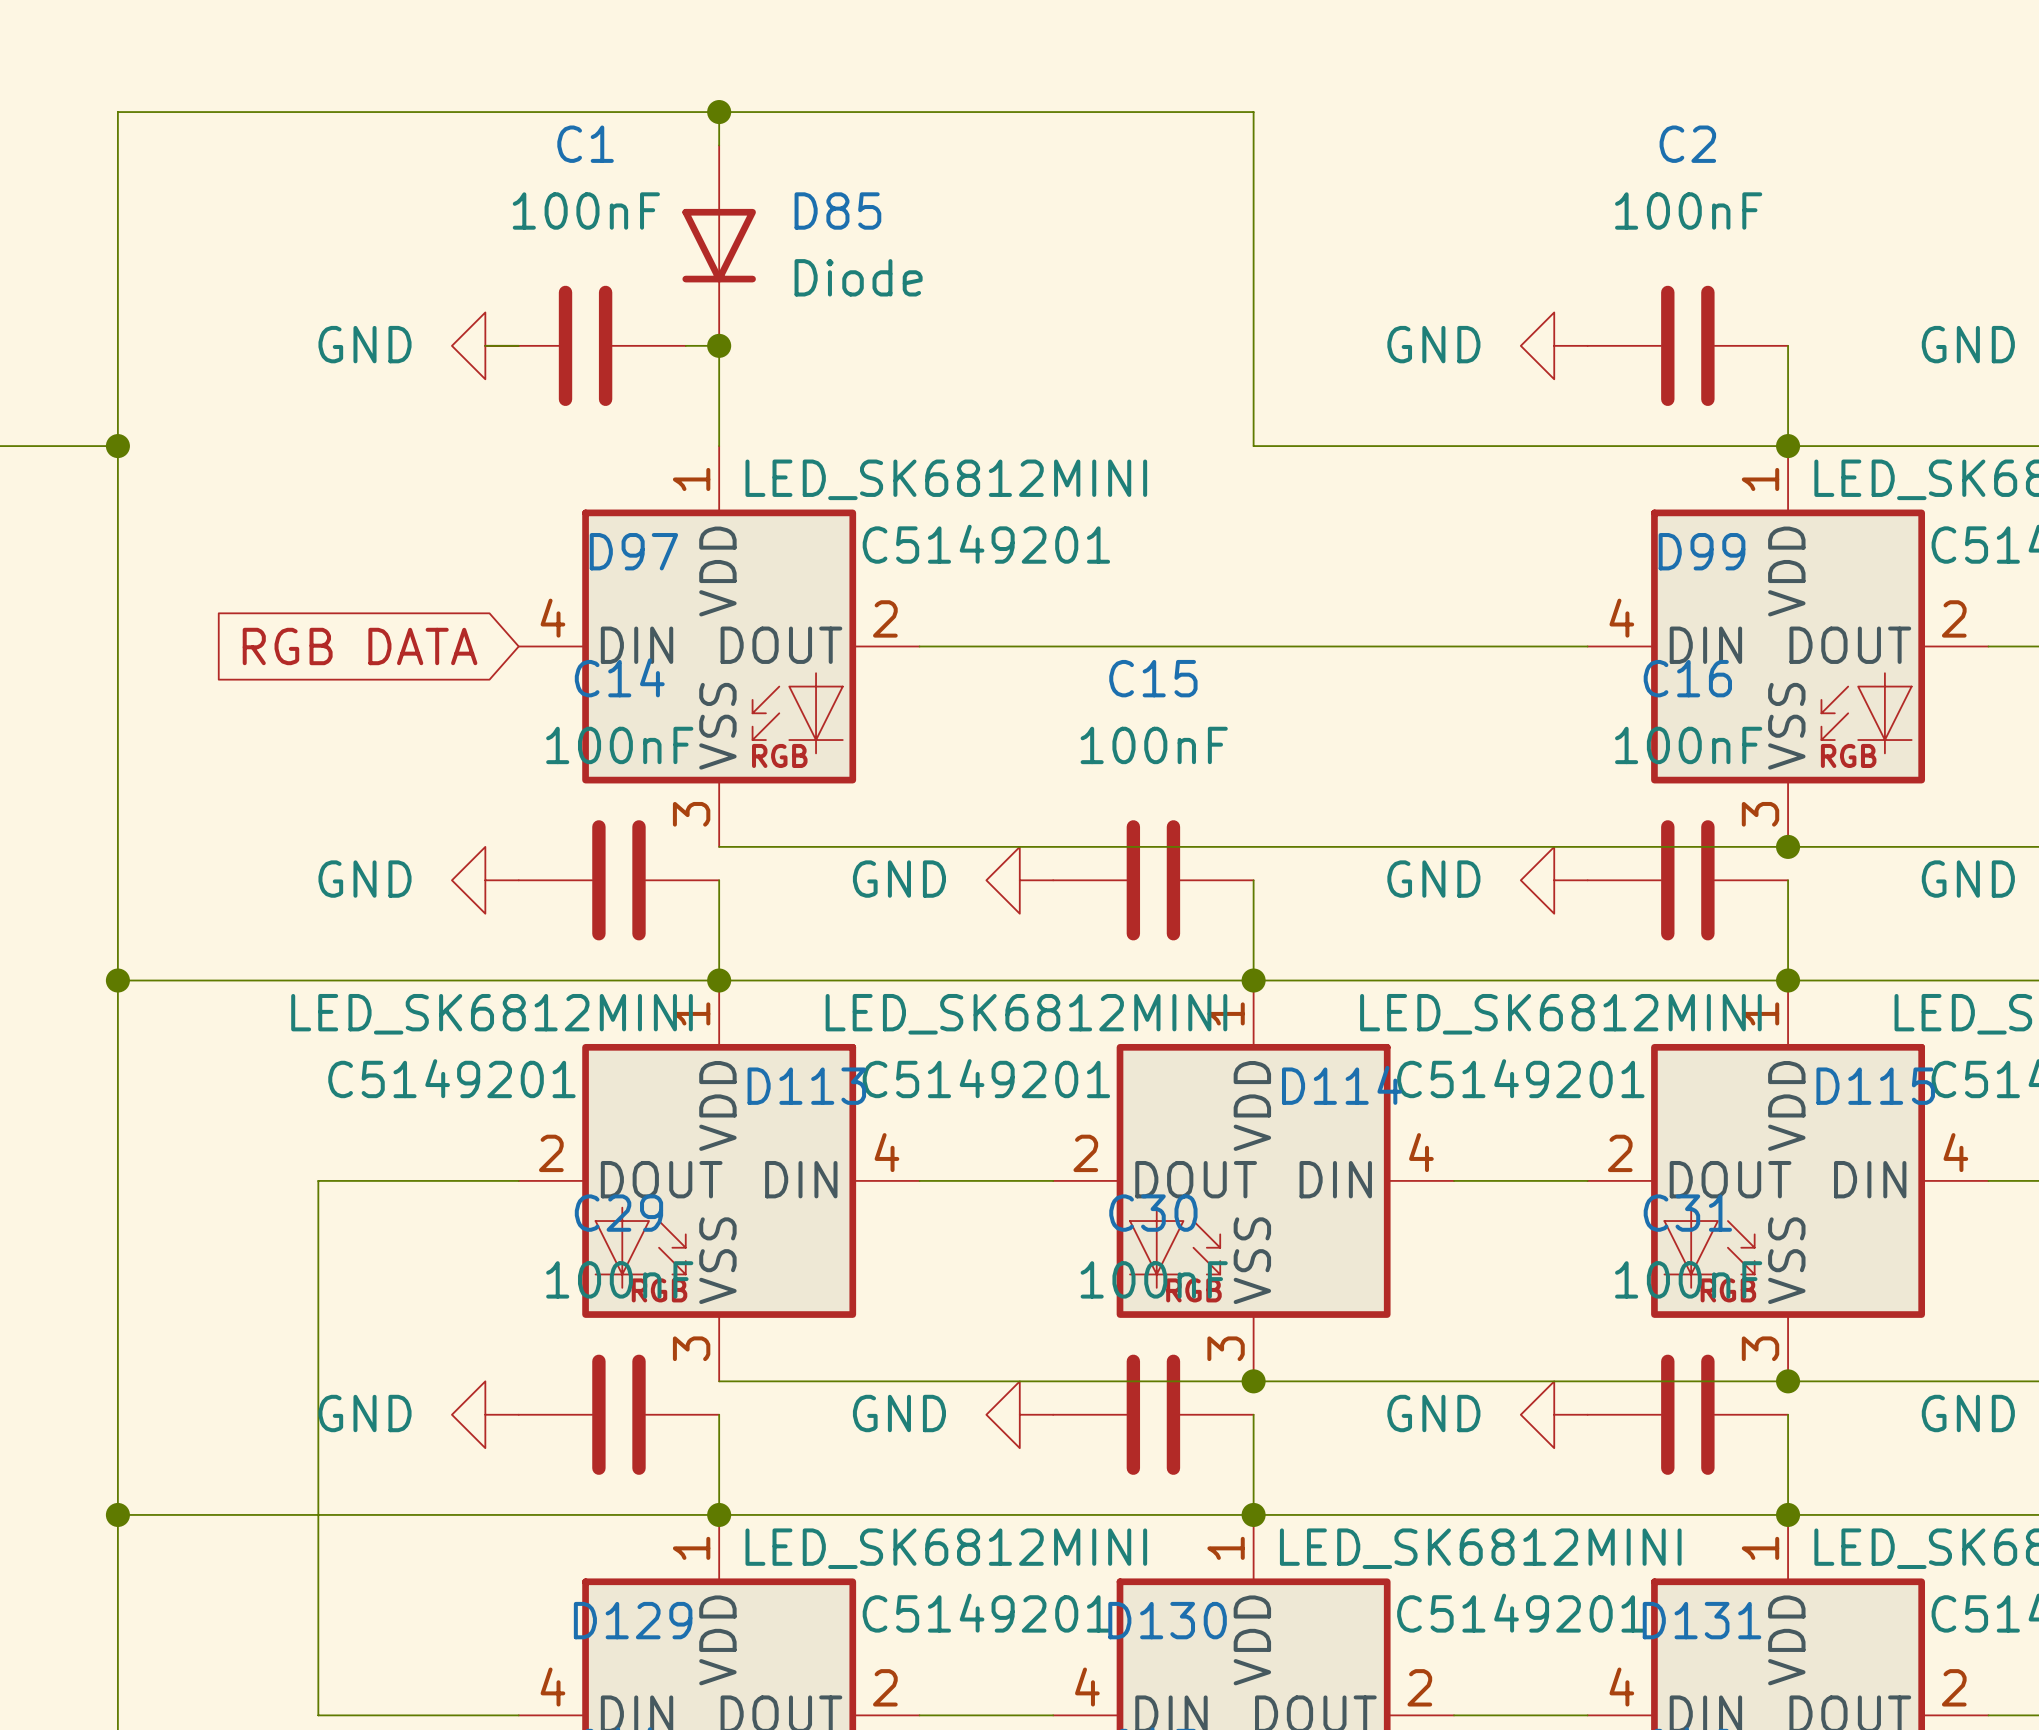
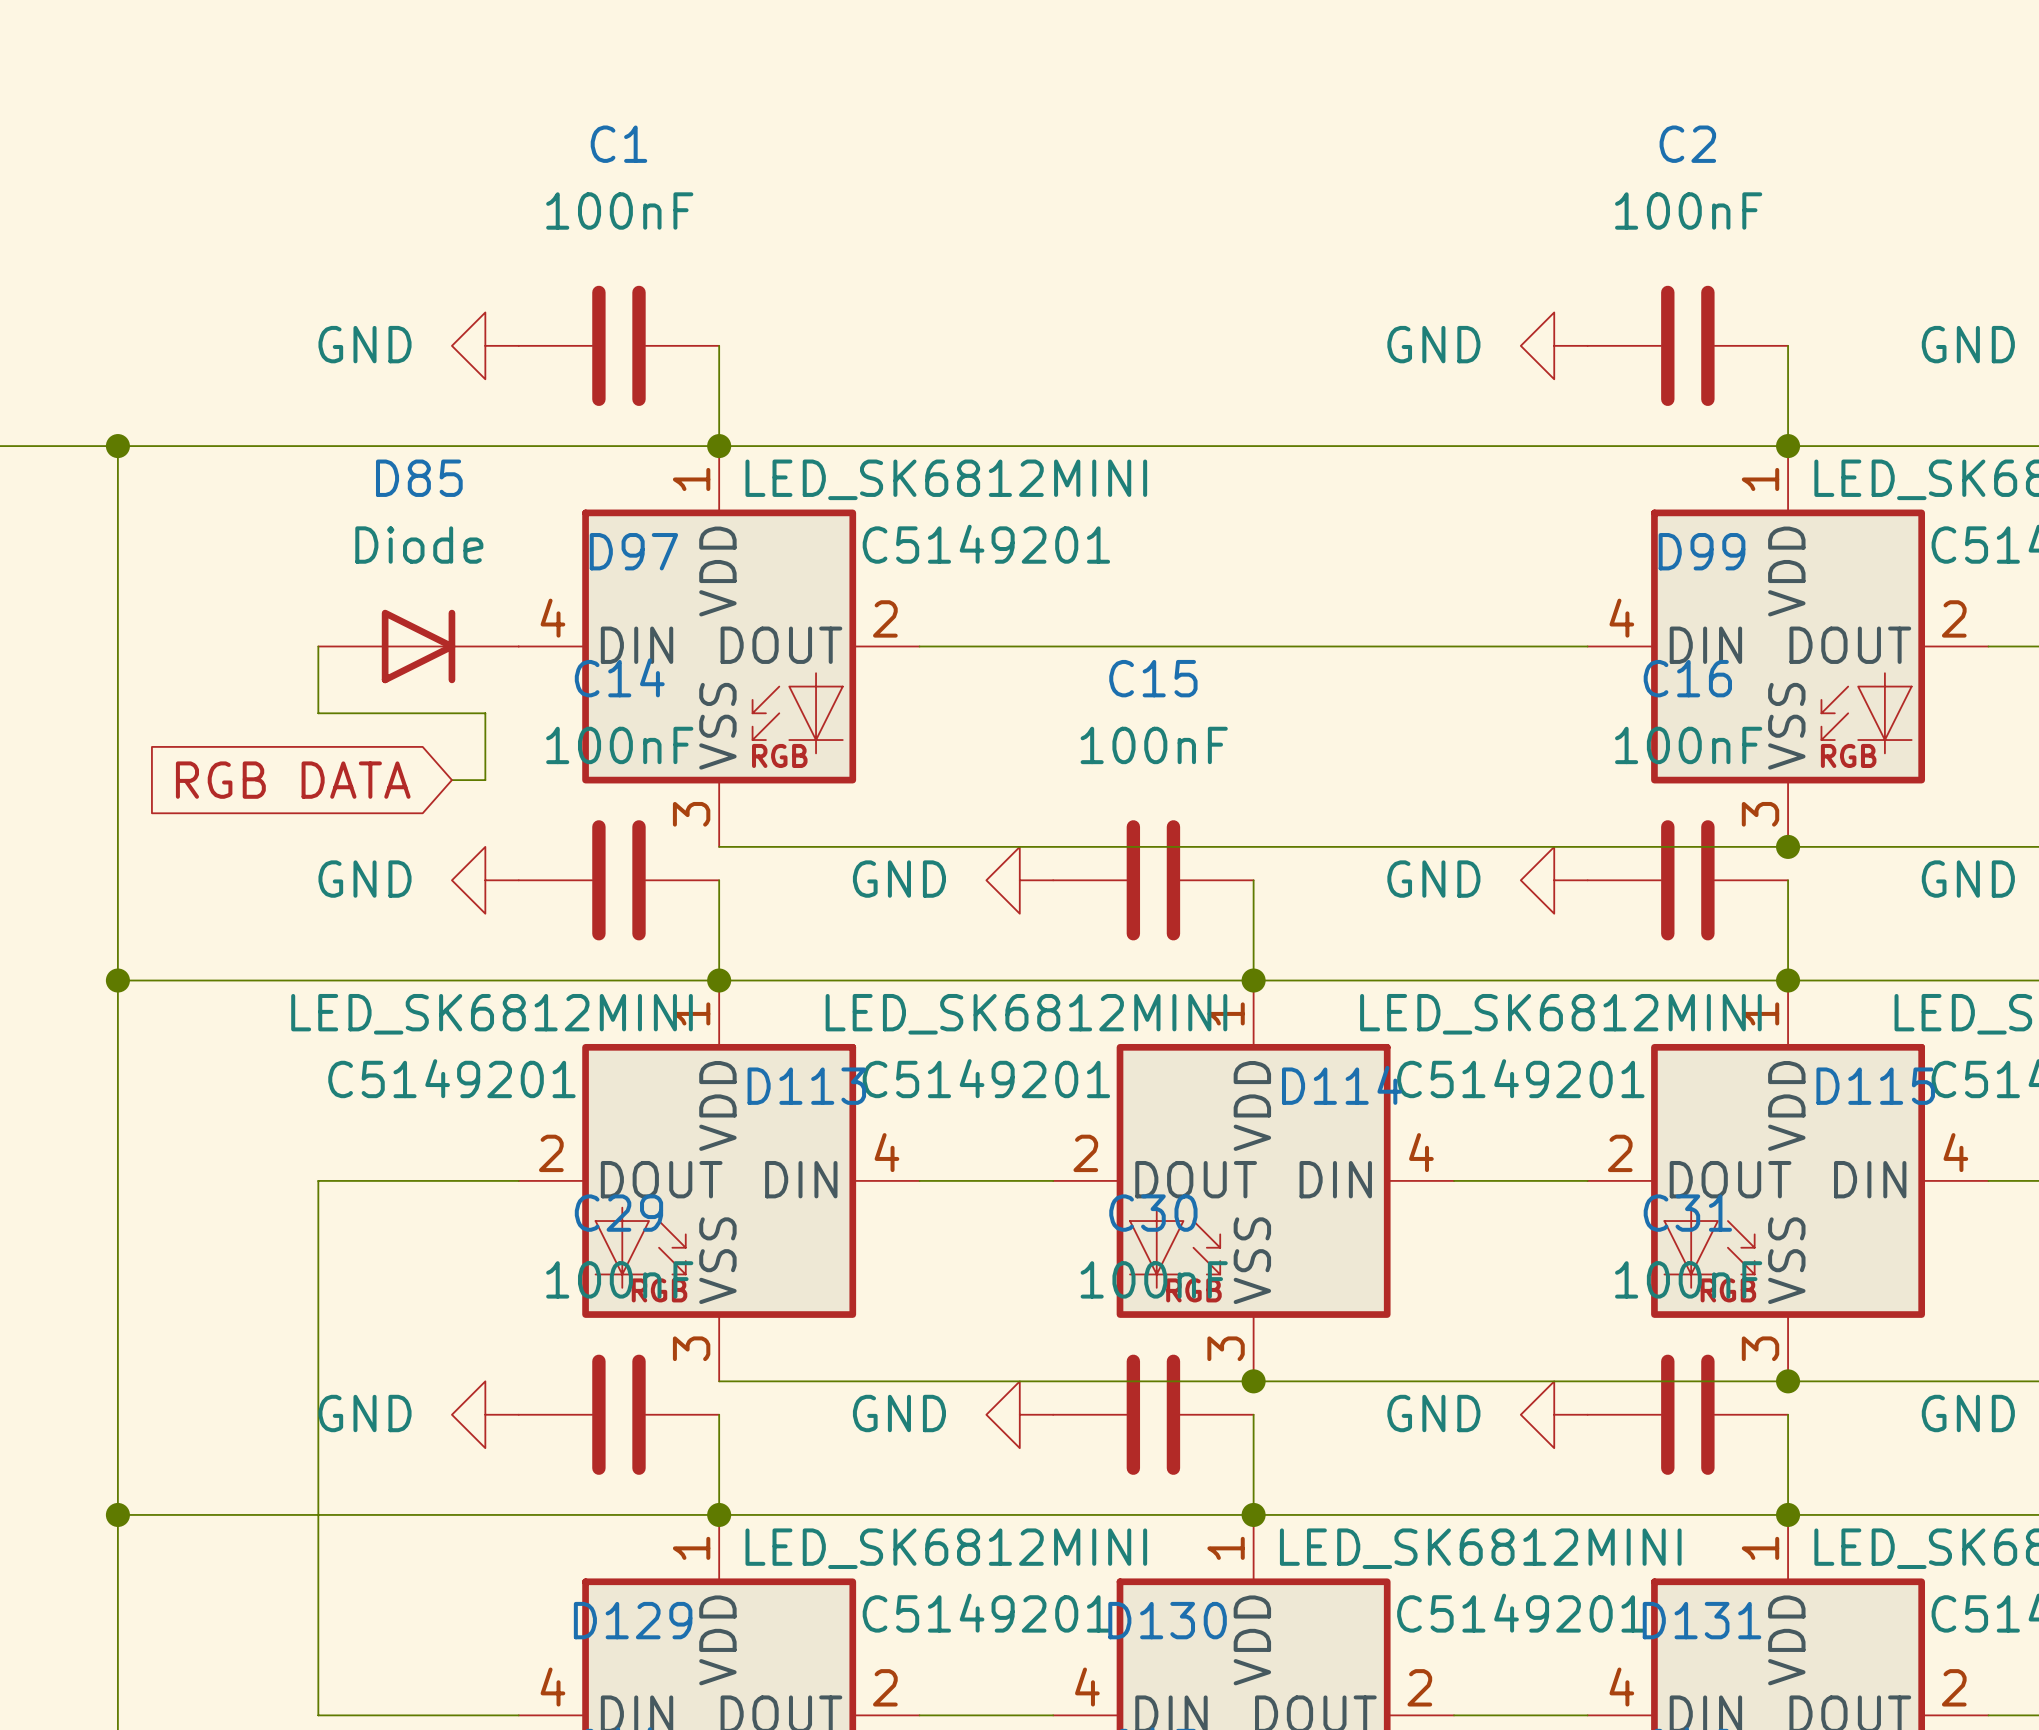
wire: (719, 112) (719, 145) -> none
junction: (719, 112) -> none
D85 name position: D85 (837, 211) -> D85 (419, 478)
D85 rotation: 0° (719, 245) -> 90° counterclockwise (418, 646)
D85 position: (719, 245) -> (418, 646)
D85 value position: Diode (858, 277) -> Diode (419, 545)
C1 position: (585, 345) -> (618, 345)
junction position: (719, 345) -> (719, 446)
wire: (117, 446) (117, 112) (1253, 112) (1253, 446) -> (117, 446) (1253, 446)
wire: none -> (318, 646) (318, 713) (485, 713) (485, 780) (451, 780)
global label position: RGB DATA (360, 646) -> RGB DATA (293, 780)

